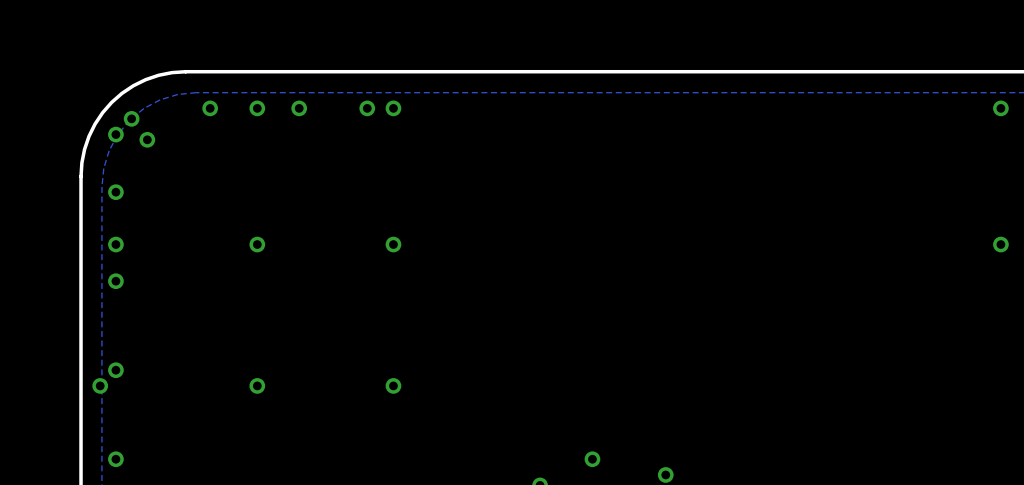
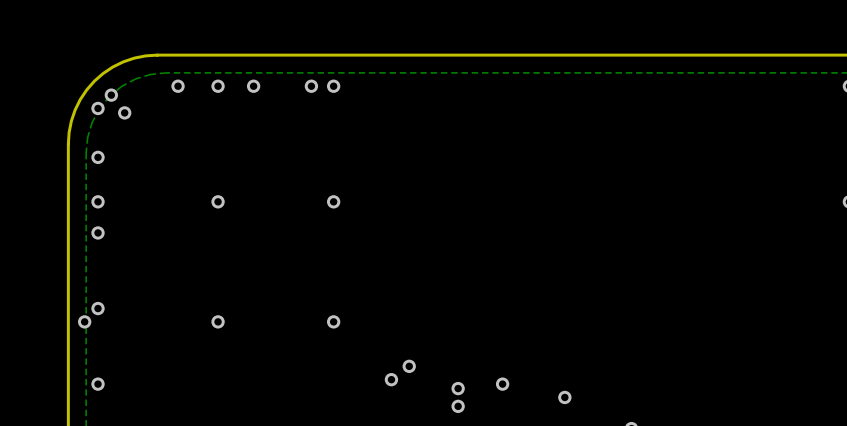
via: none -> (409, 366)
via: none -> (391, 379)
via: none -> (458, 388)

